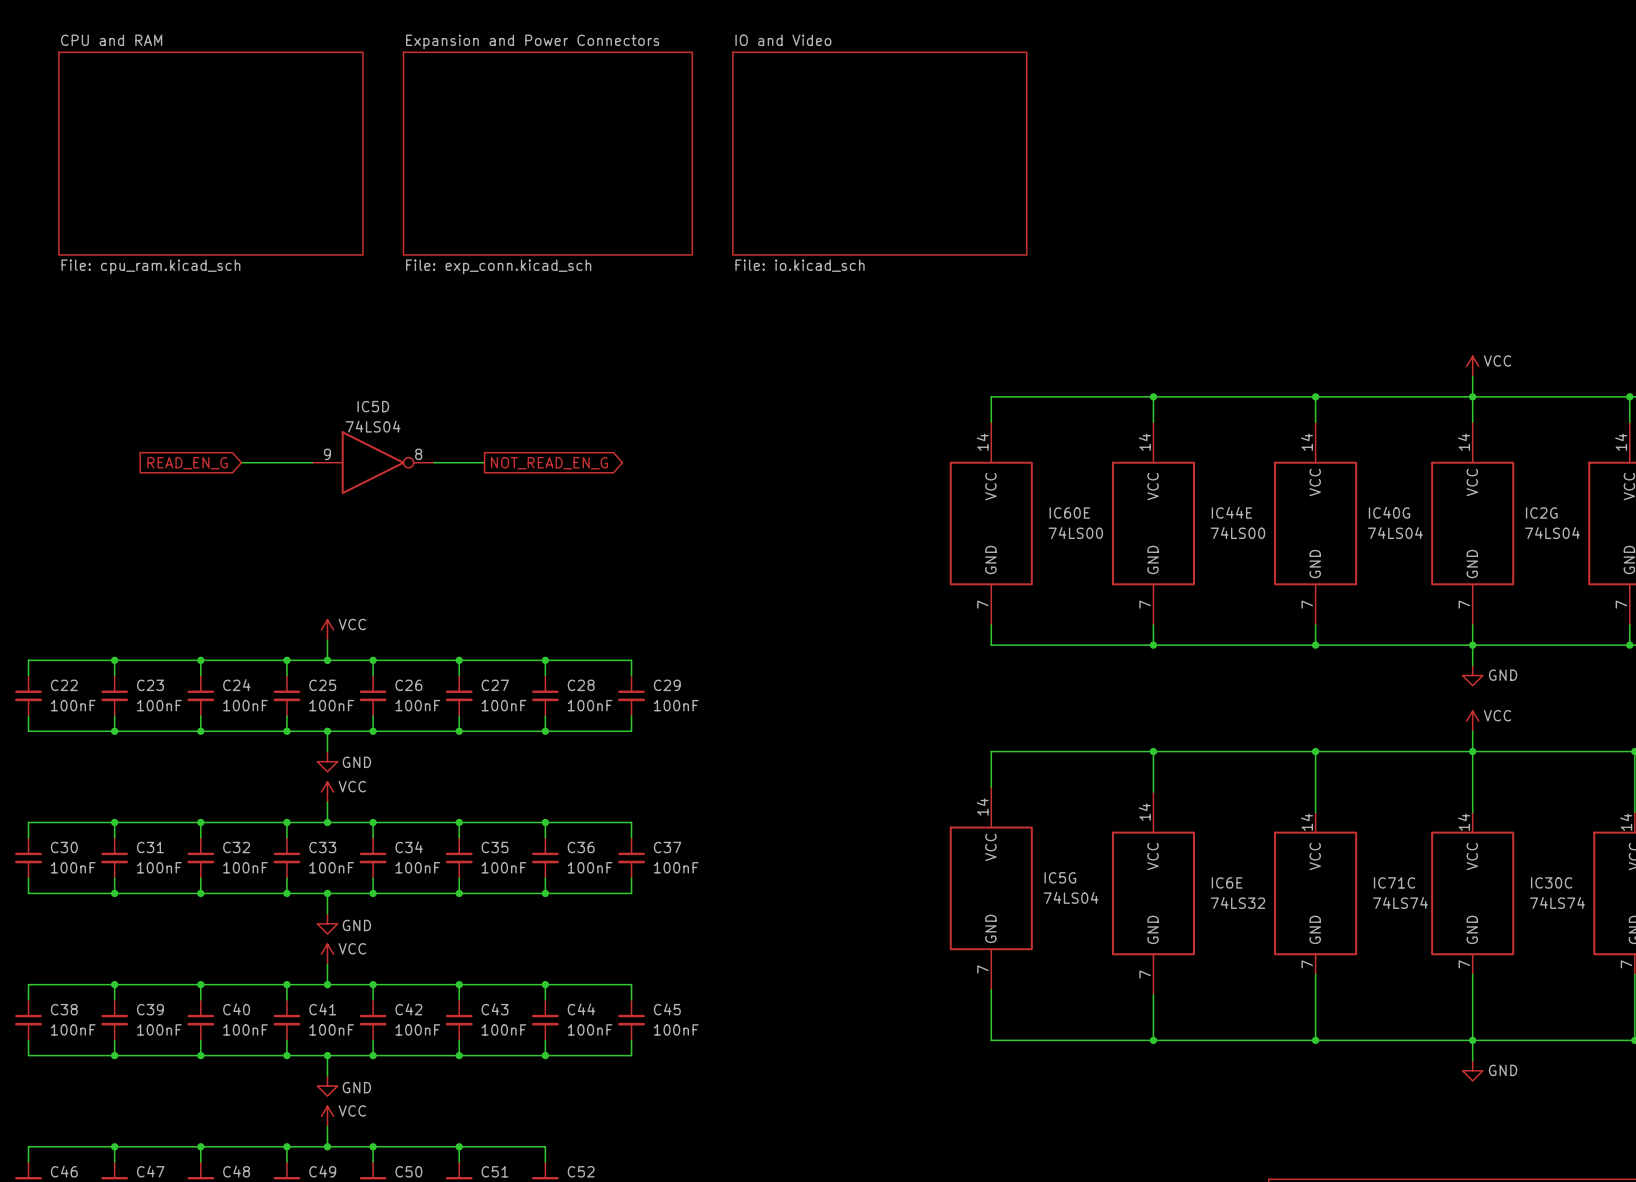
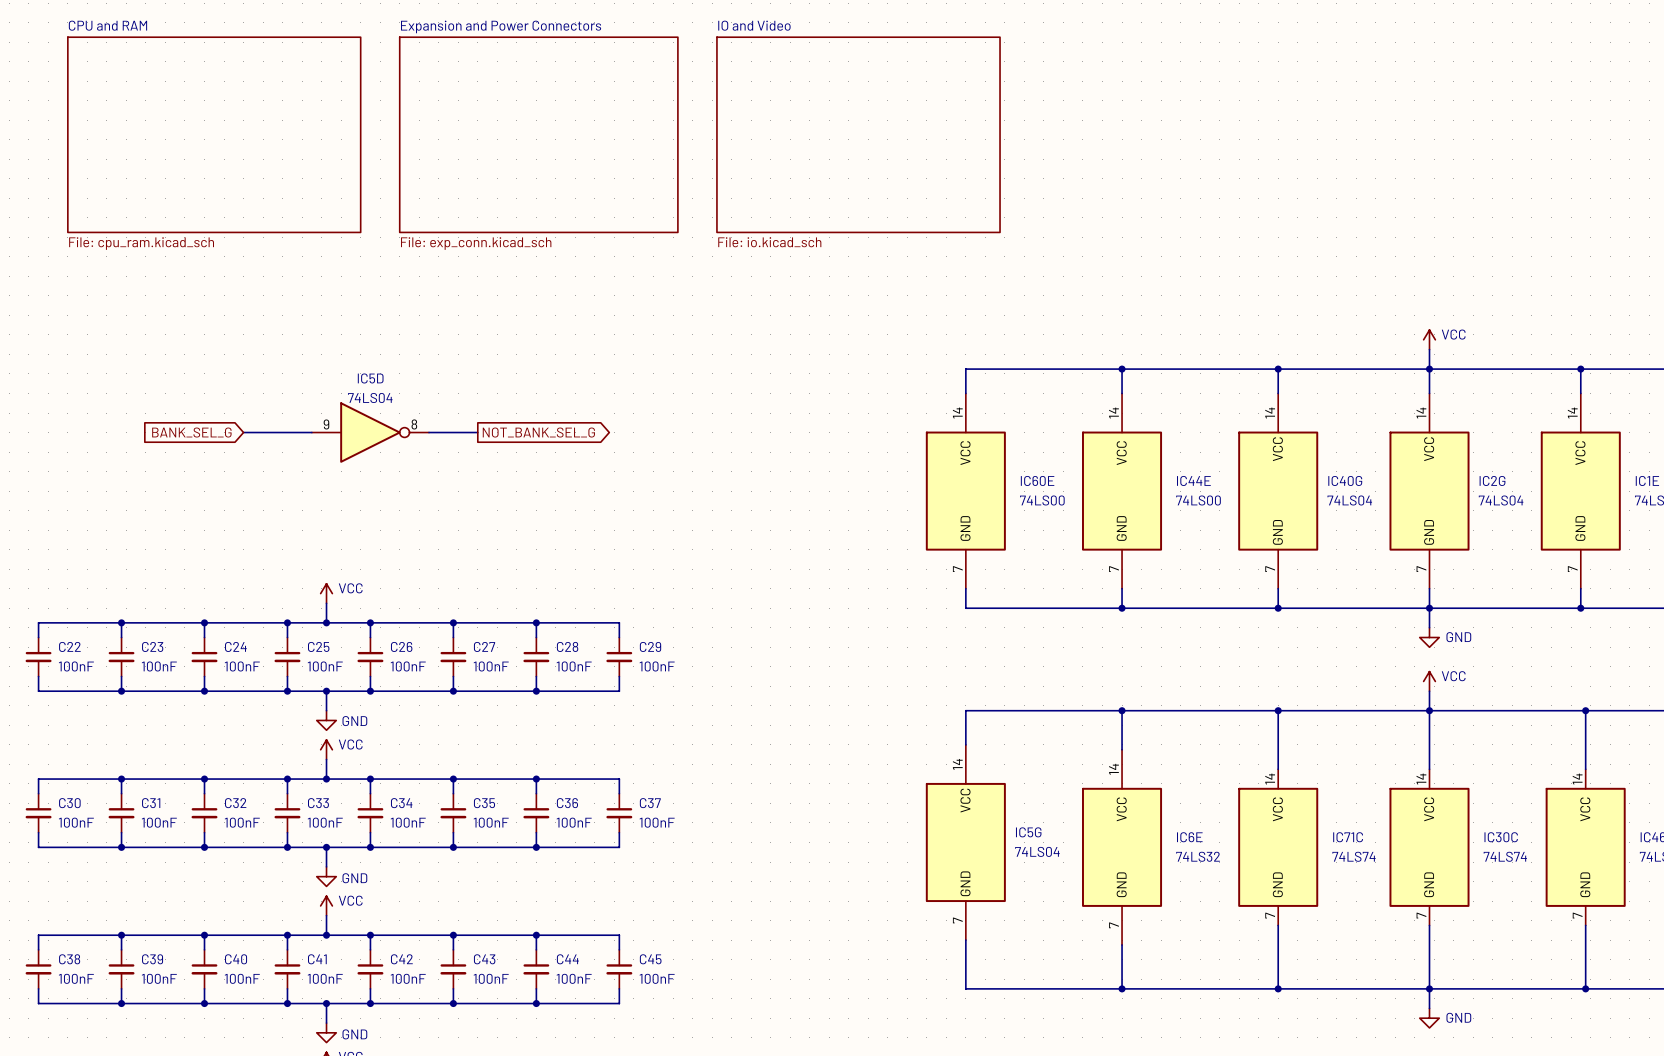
global label: READ_EN_G (187, 463) -> BANK_SEL_G (191, 432)
global label: NOT_READ_EN_G (549, 463) -> NOT_BANK_SEL_G (538, 432)

